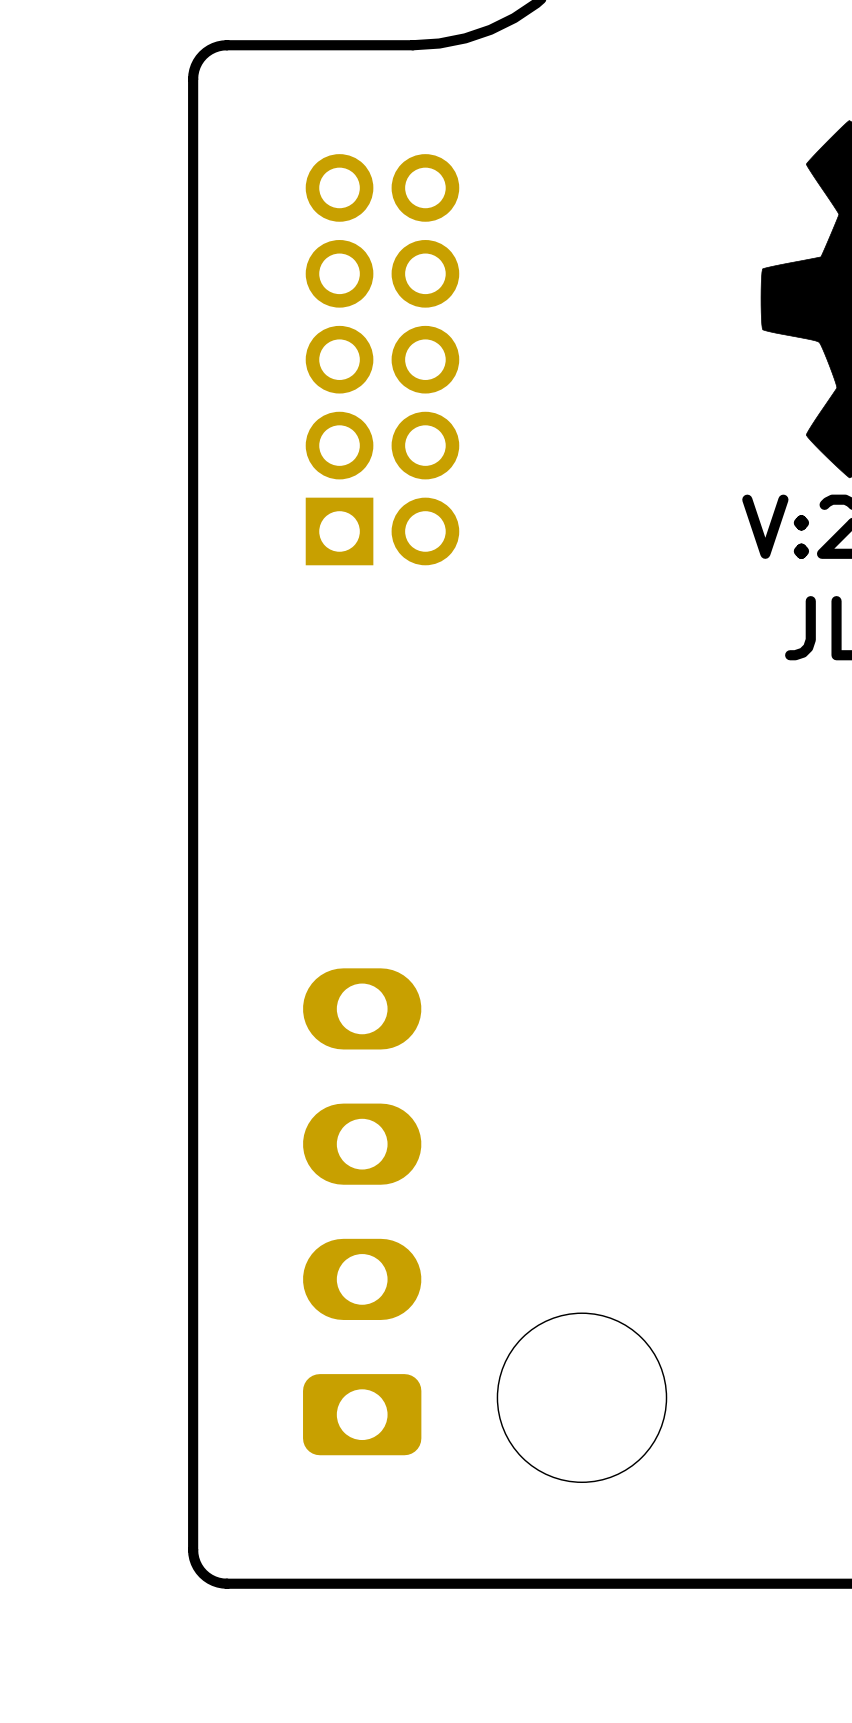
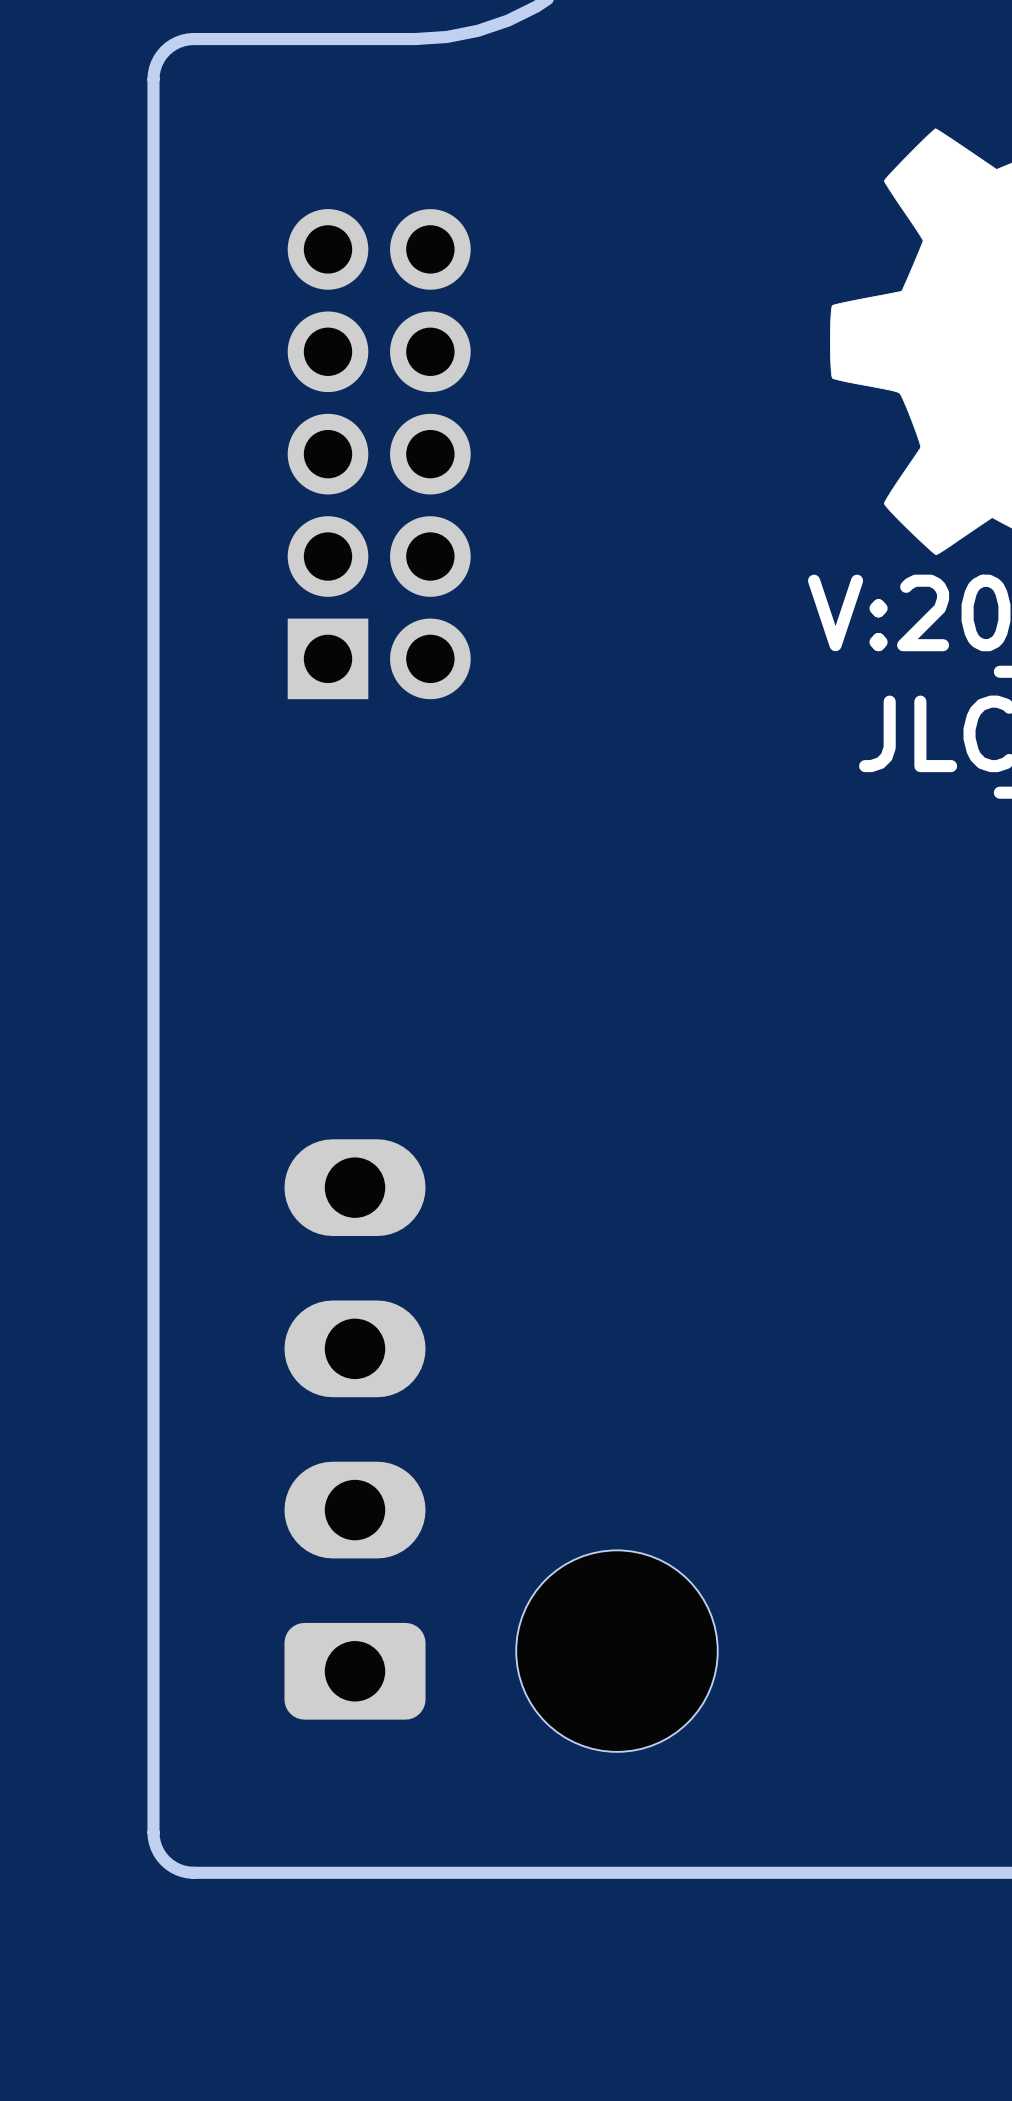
part position: (382, 359) -> (379, 454)

